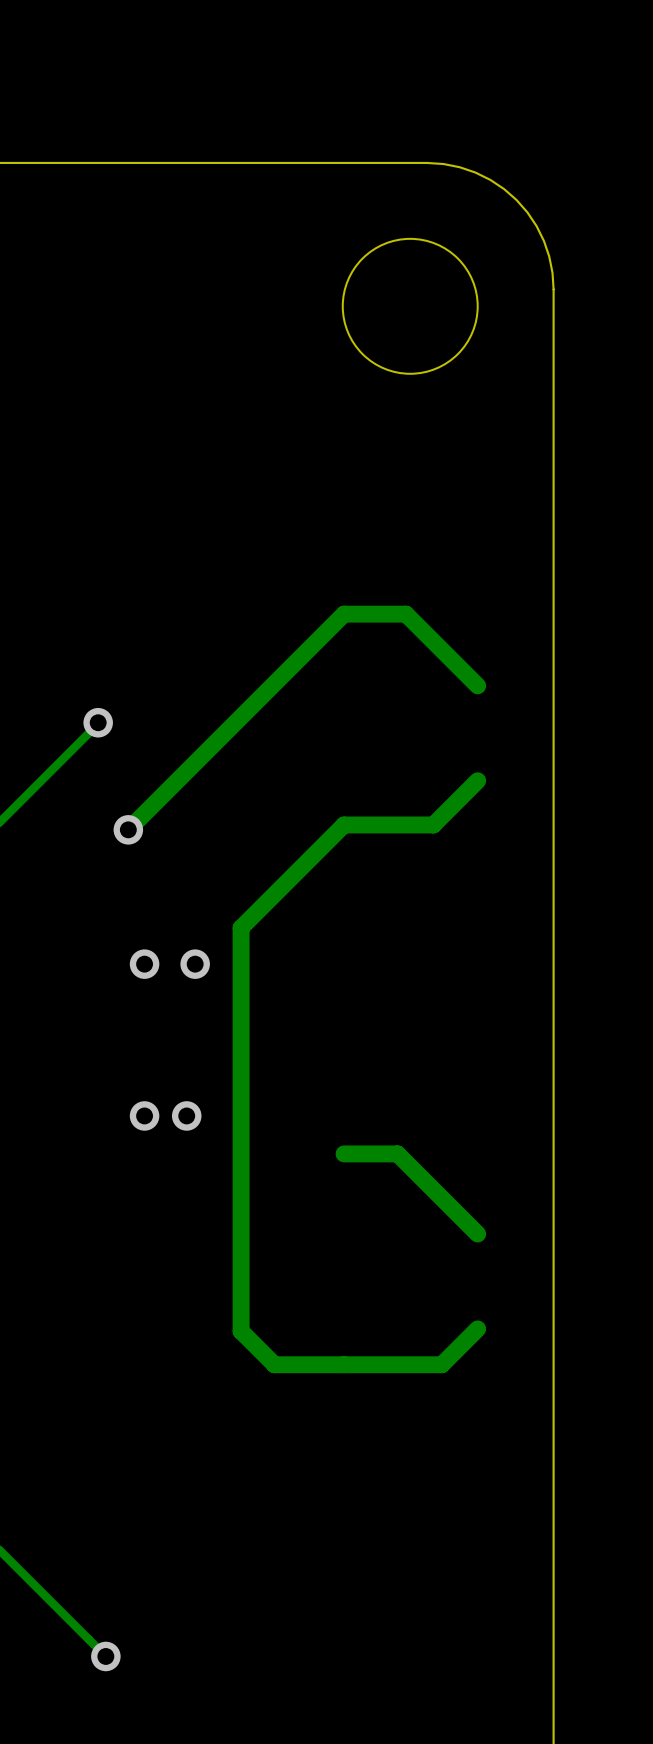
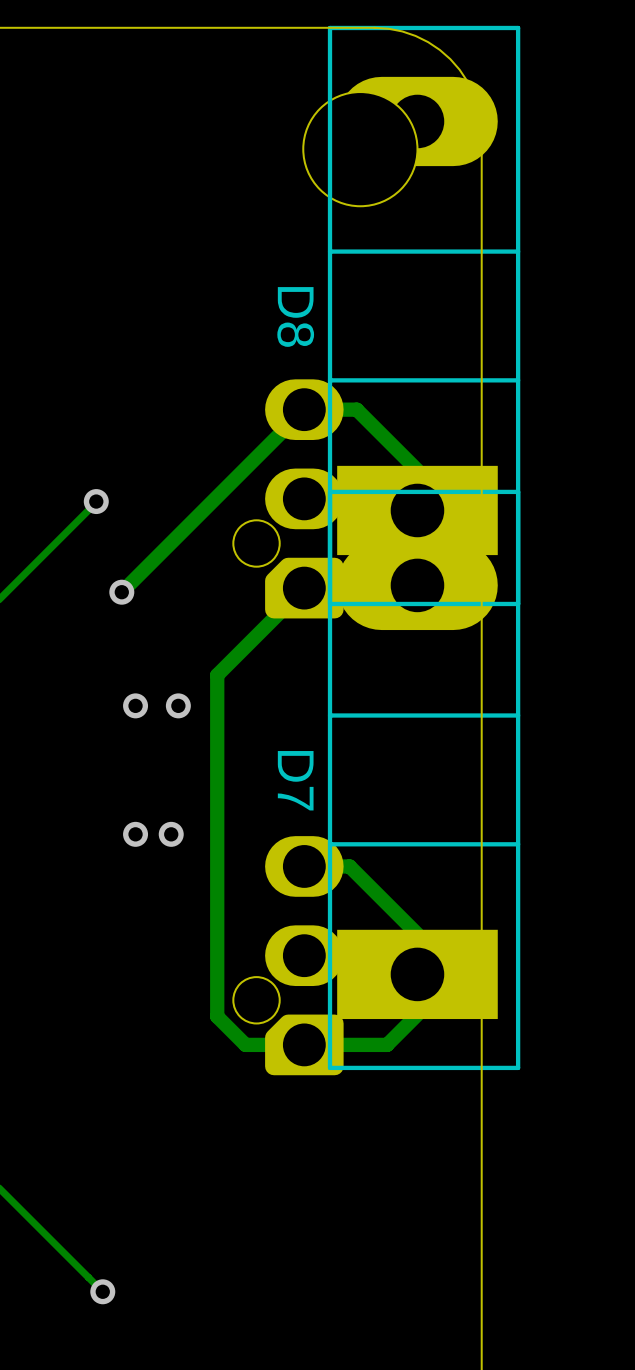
D8: none -> (424, 315)
part: none -> (288, 498)
D7: none -> (424, 779)
part: none -> (288, 955)

